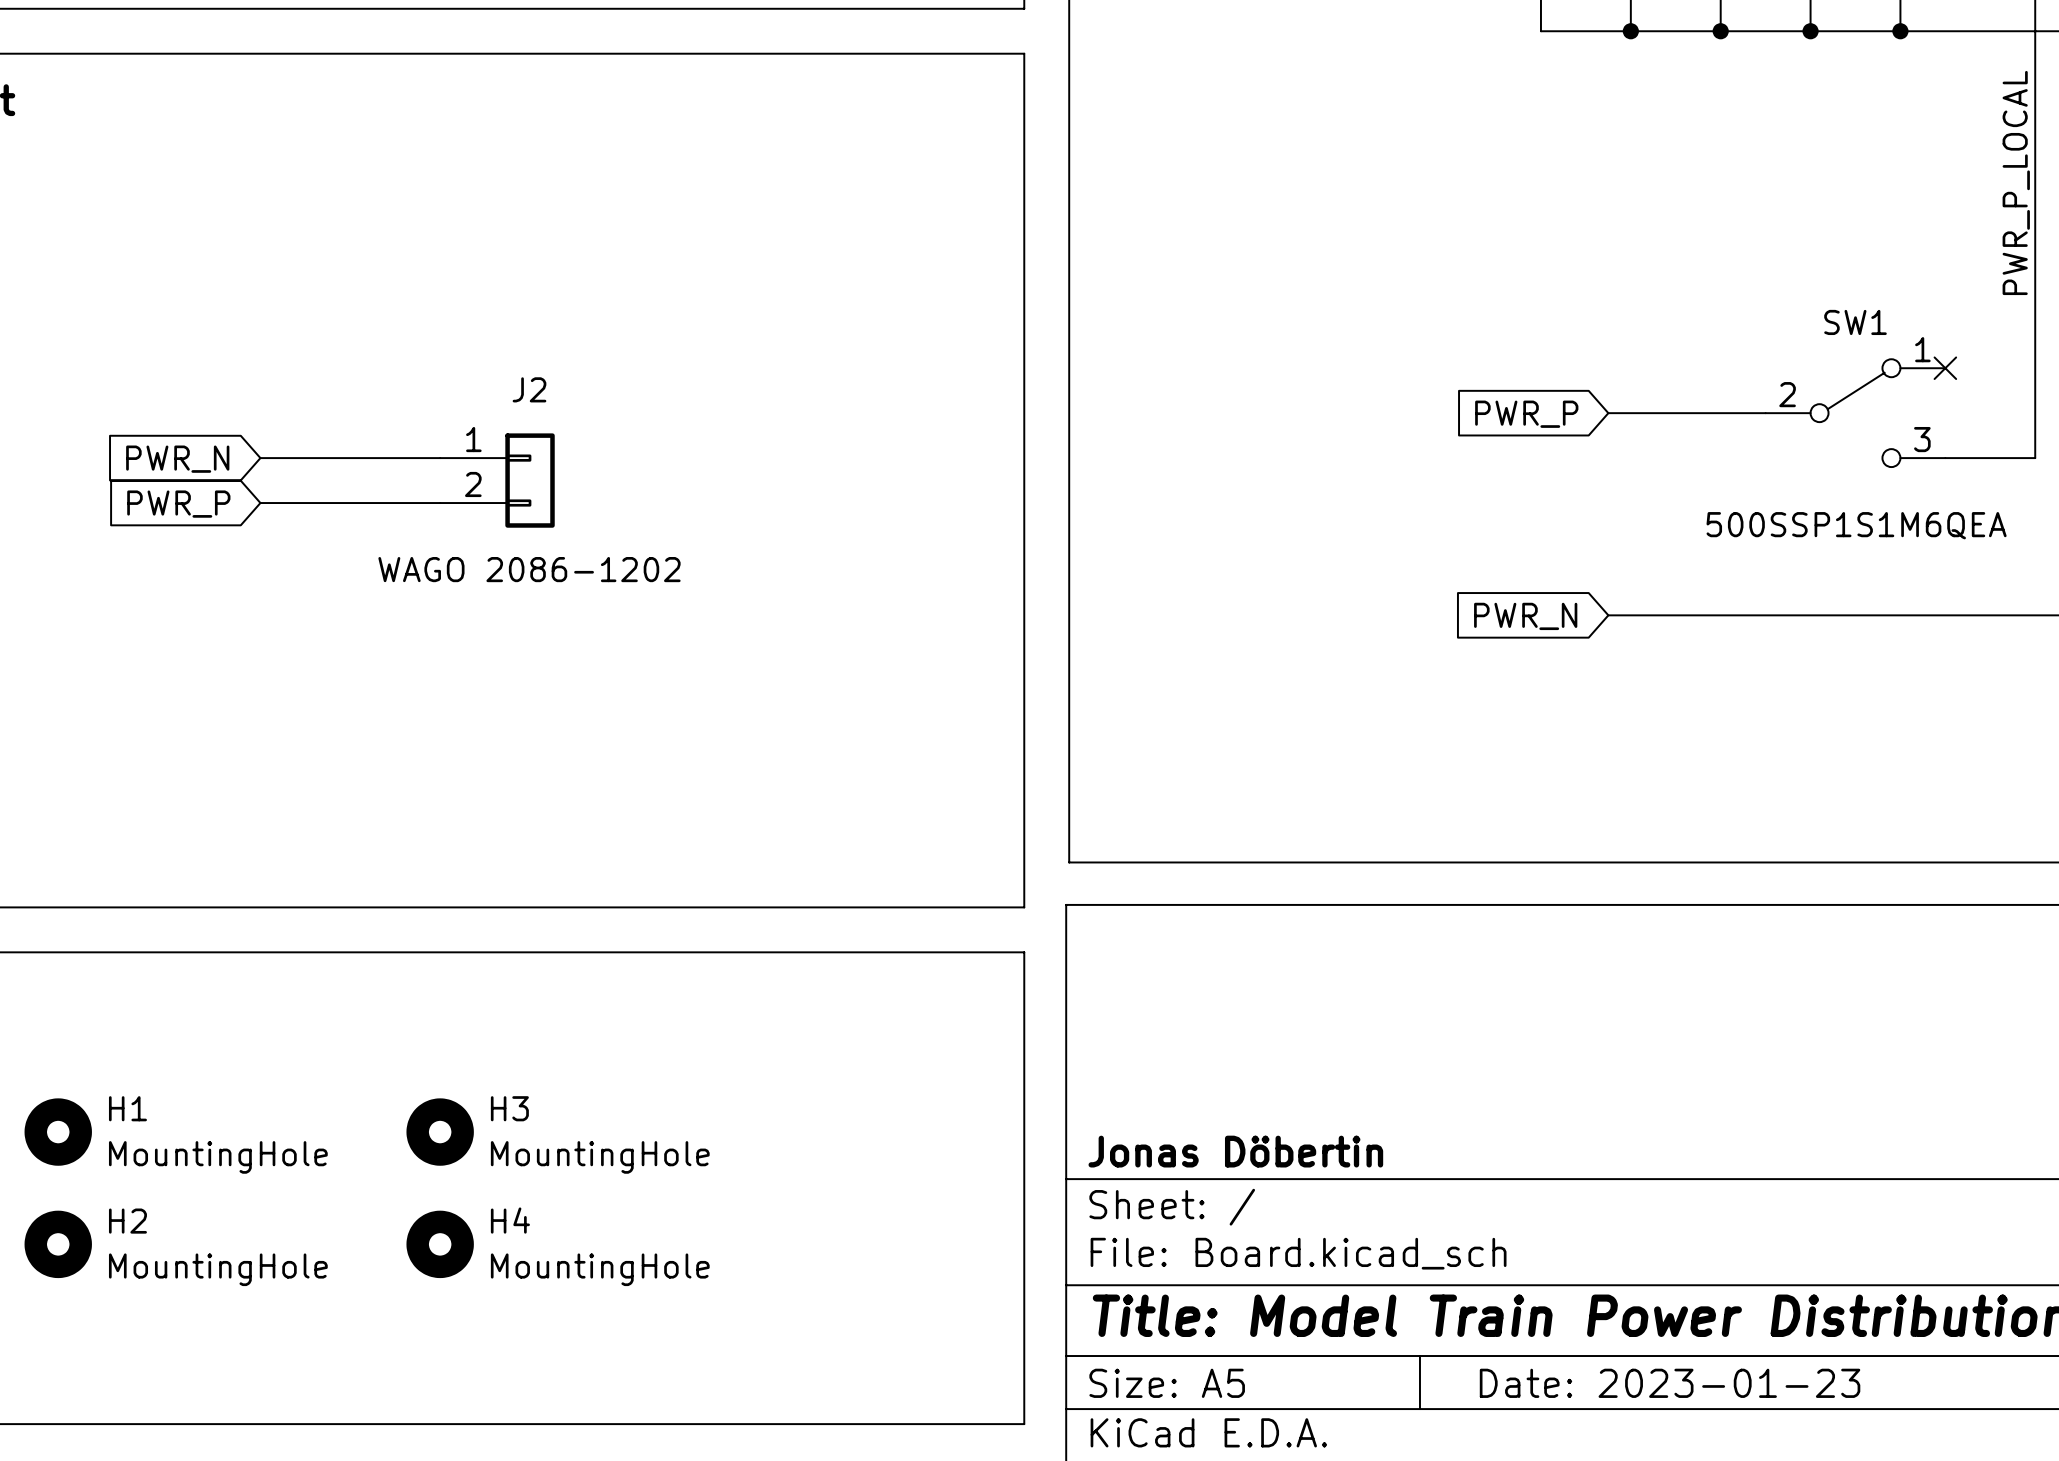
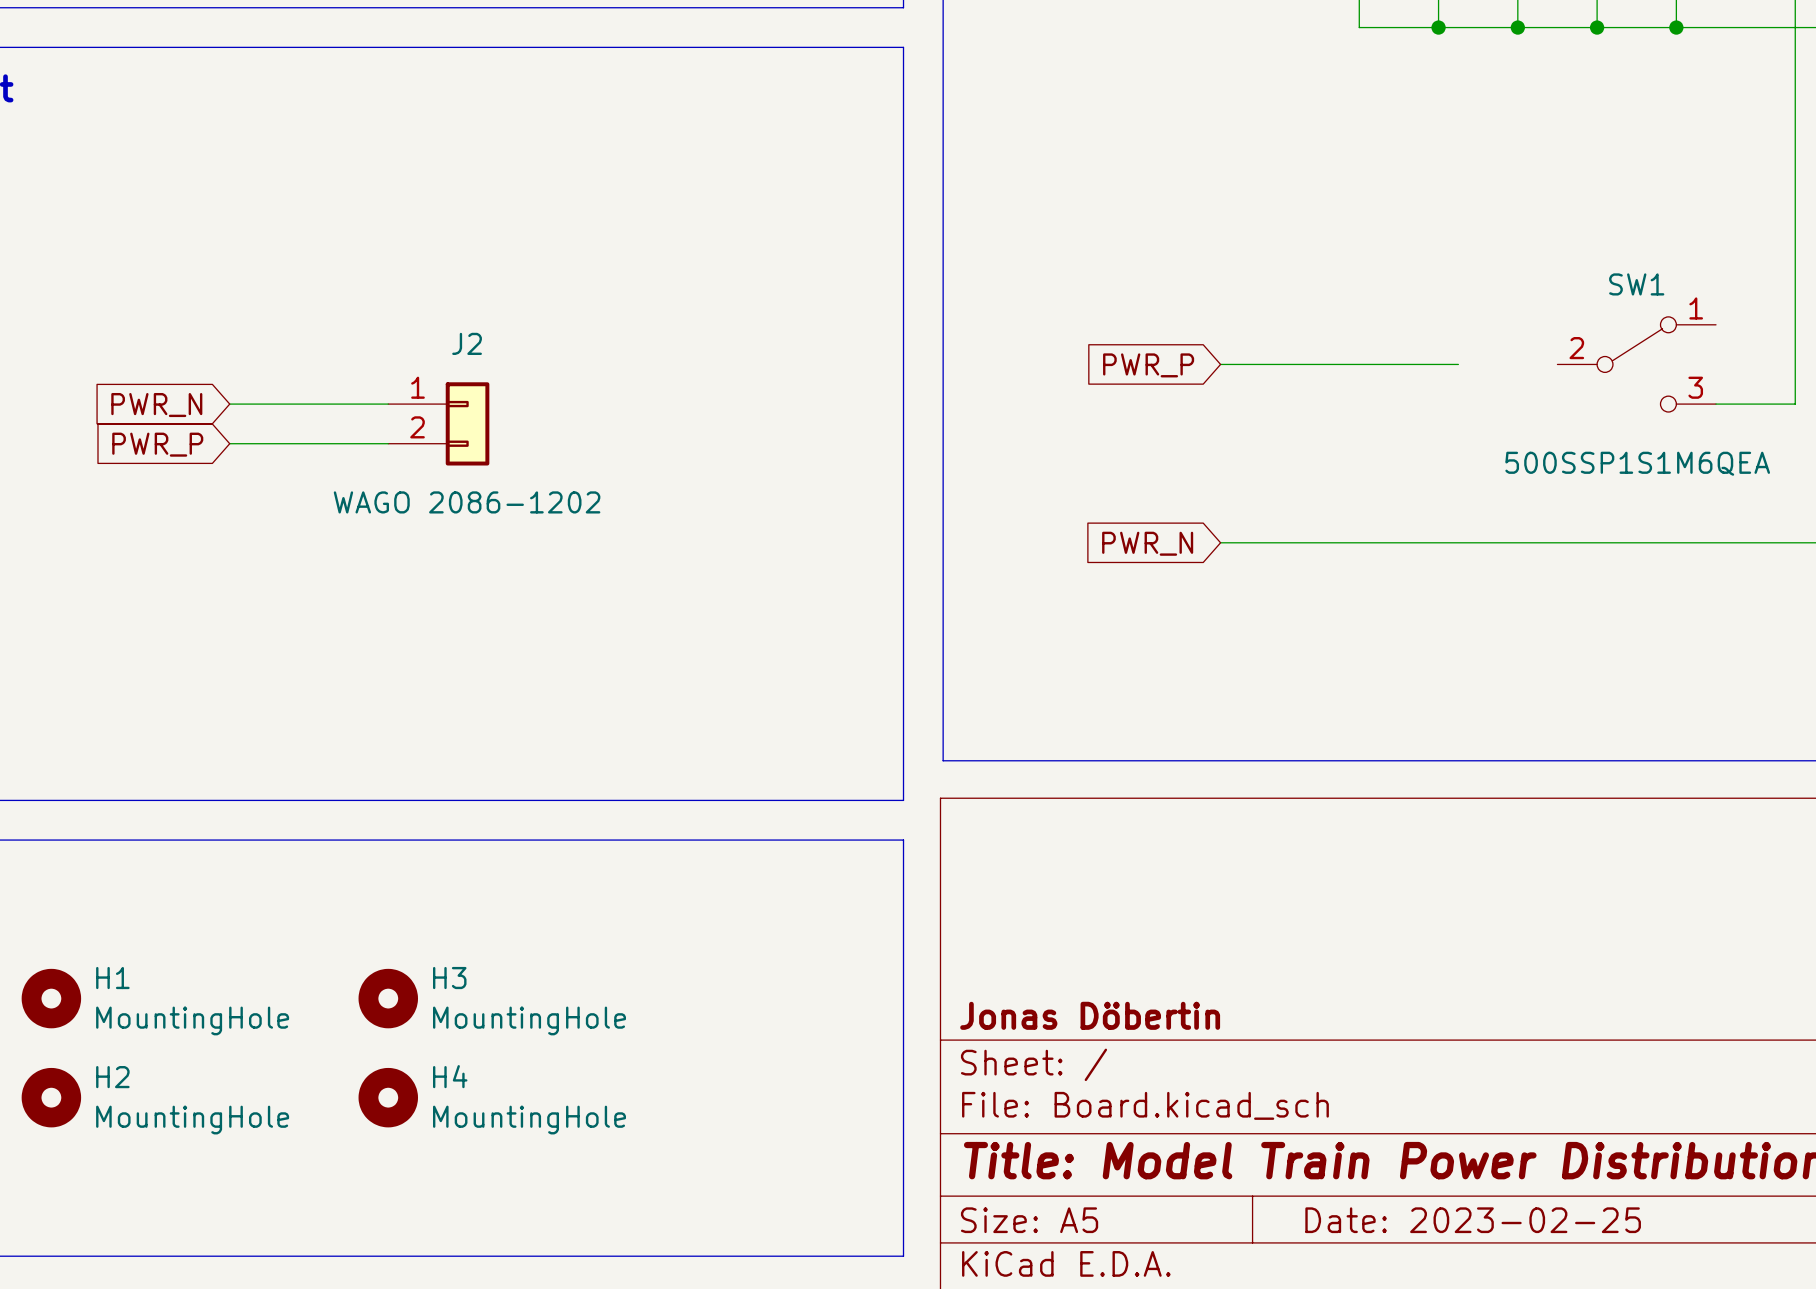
label: PWR_P_LOCAL (2016, 182) -> none
no-connect mark: (1945, 368) -> none
wire: none -> (1220, 364) (1418, 364)
wire: (1653, 413) (1765, 413) -> none
global label position: PWR_P (1526, 414) -> PWR_P (1148, 365)
wire: none -> (1220, 542) (1418, 542)
global label position: PWR_N (1525, 616) -> PWR_N (1147, 543)
title block: Date: 2023-01-23 (1670, 1383) -> Date: 2023-02-25 (1473, 1220)

